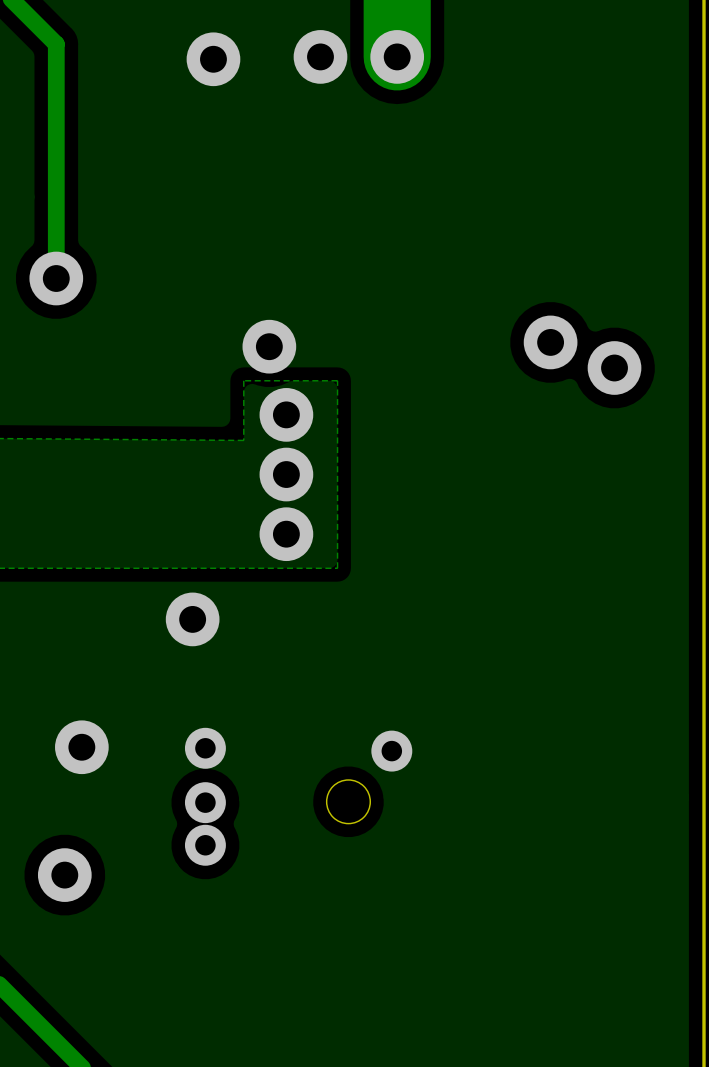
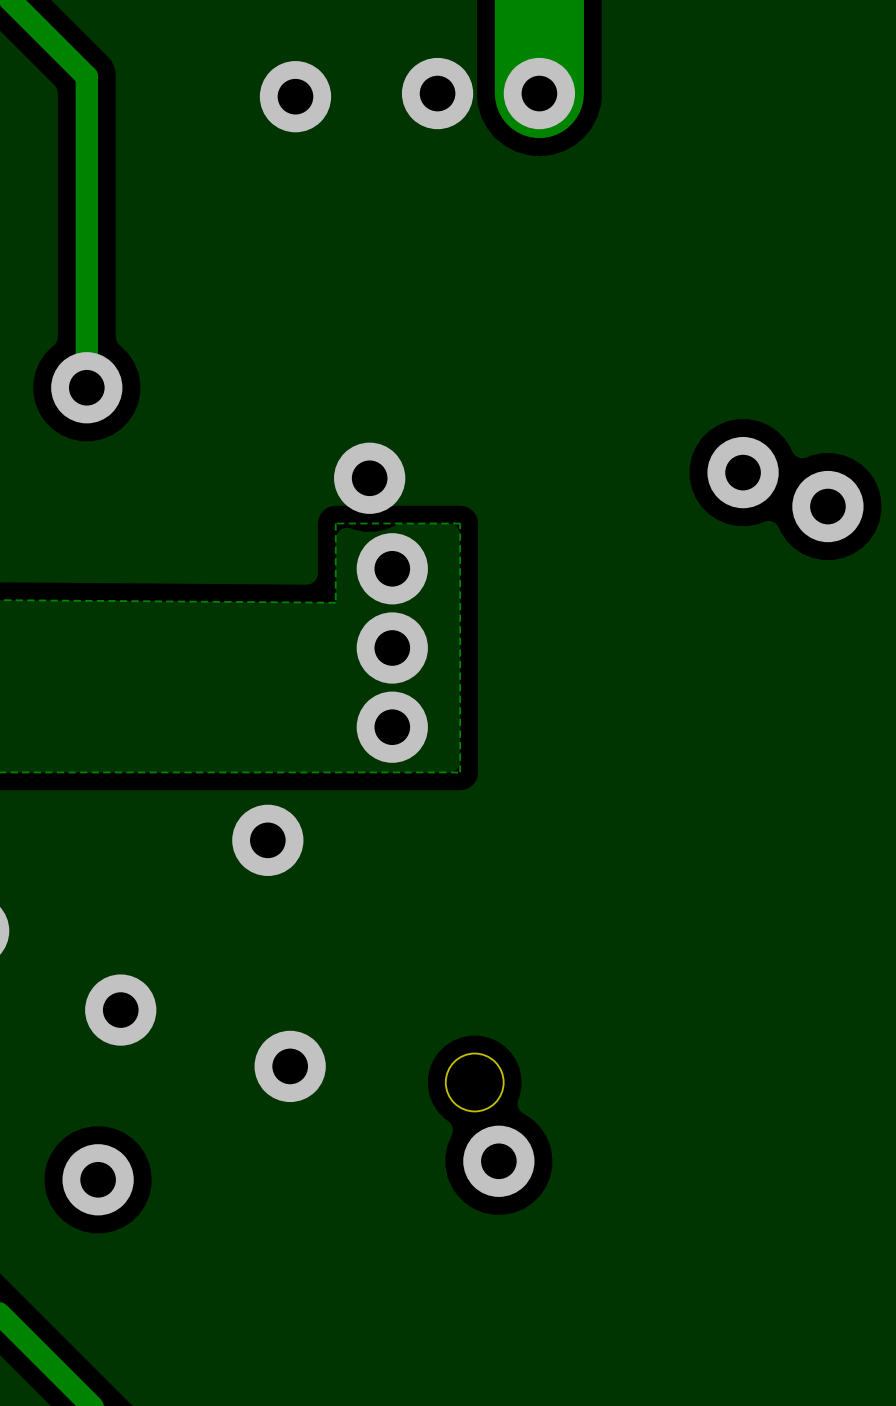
via: (205, 748) -> none
via: (391, 751) -> none
via size: [184, 782, 226, 824] -> [254, 1030, 326, 1103]
via: (205, 845) -> none
via: none -> (498, 1161)

